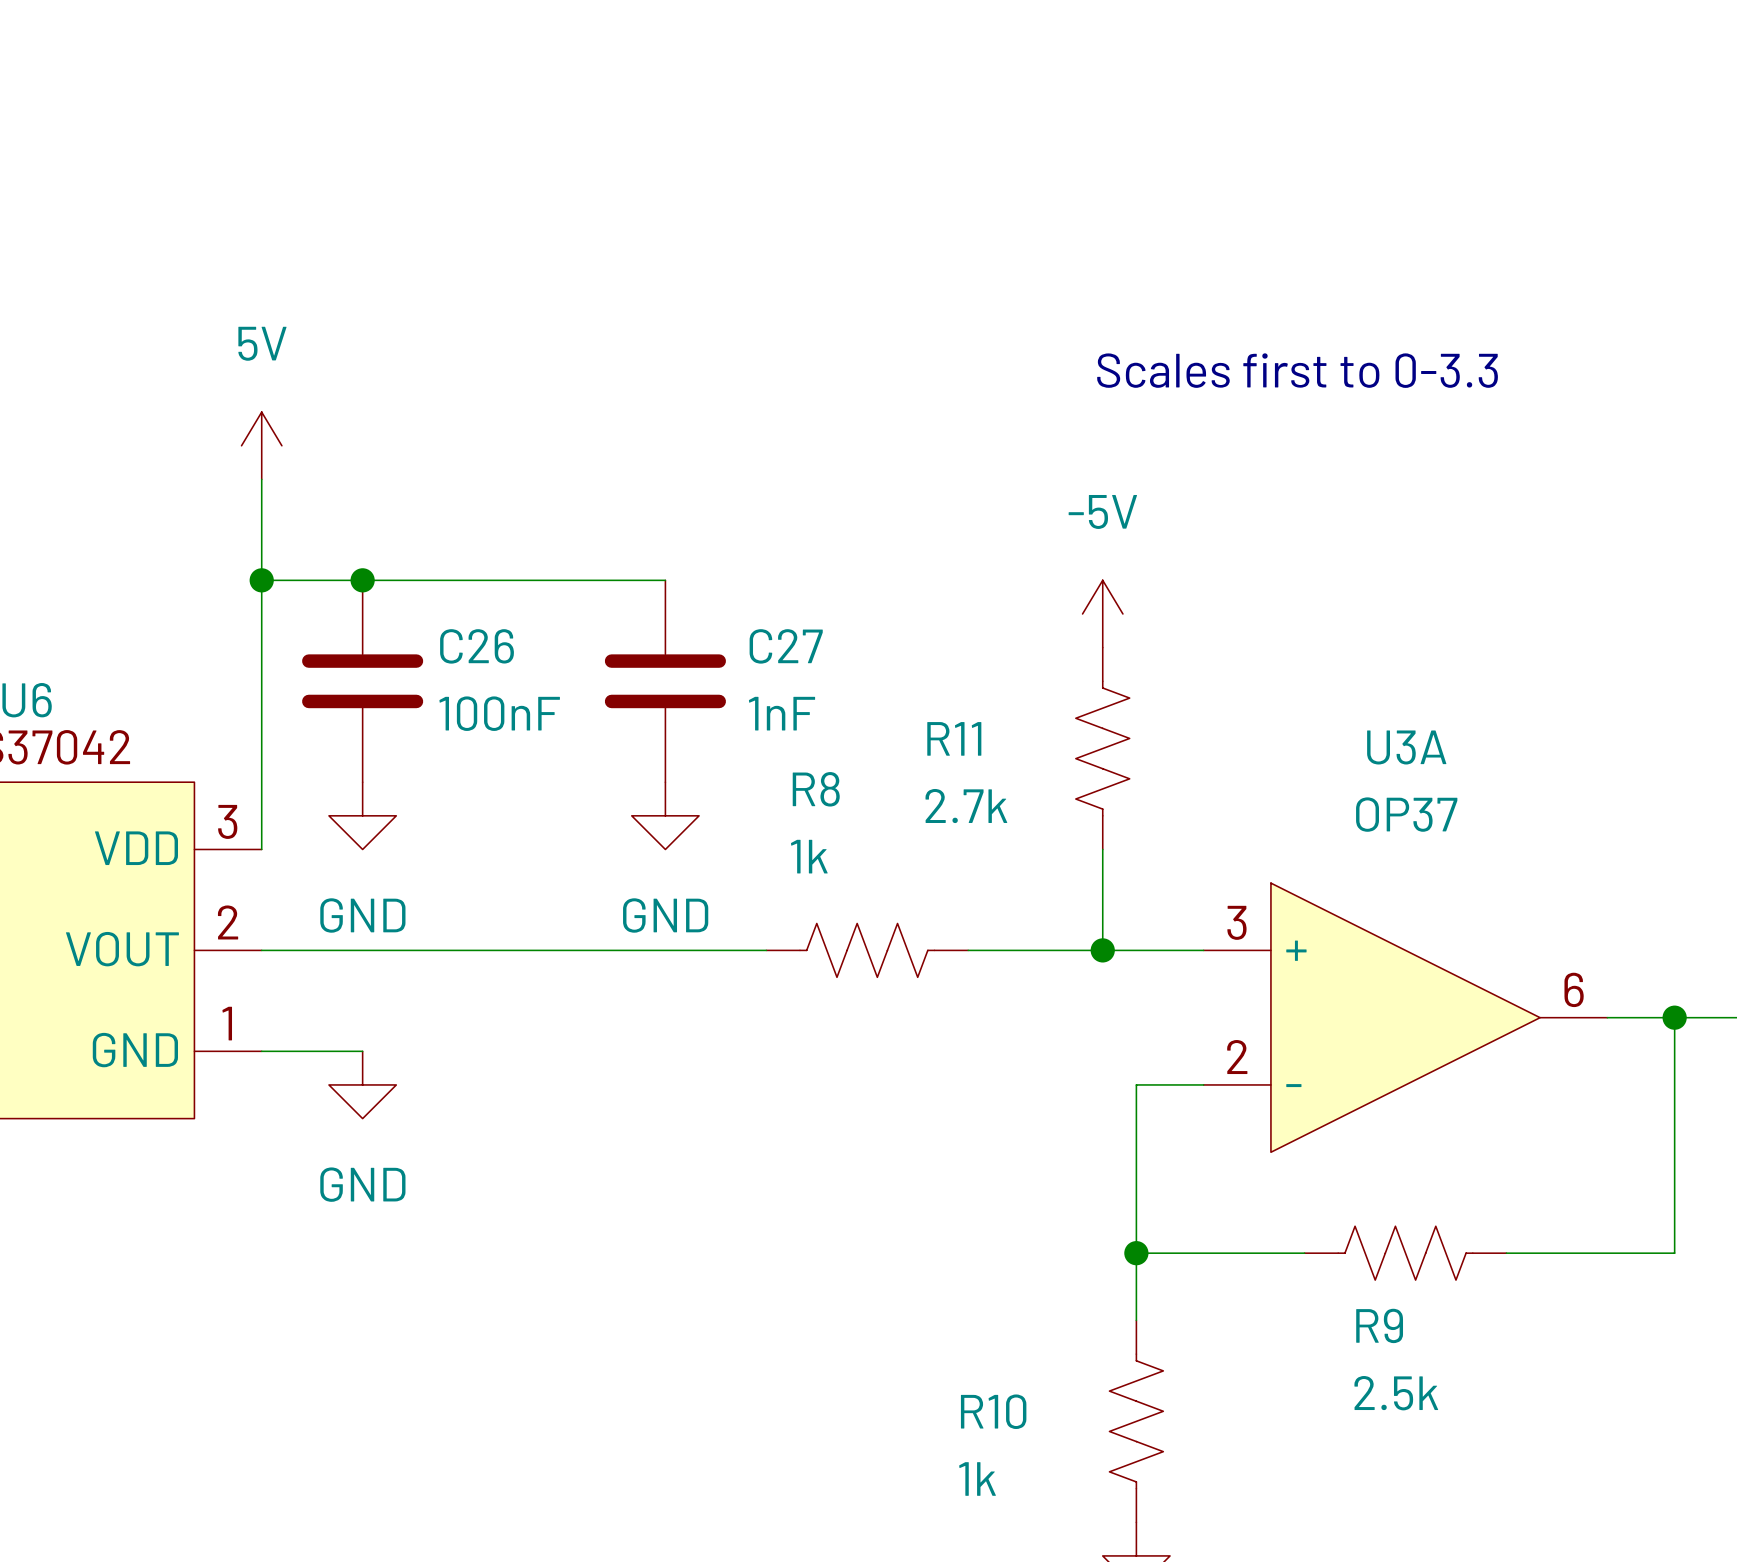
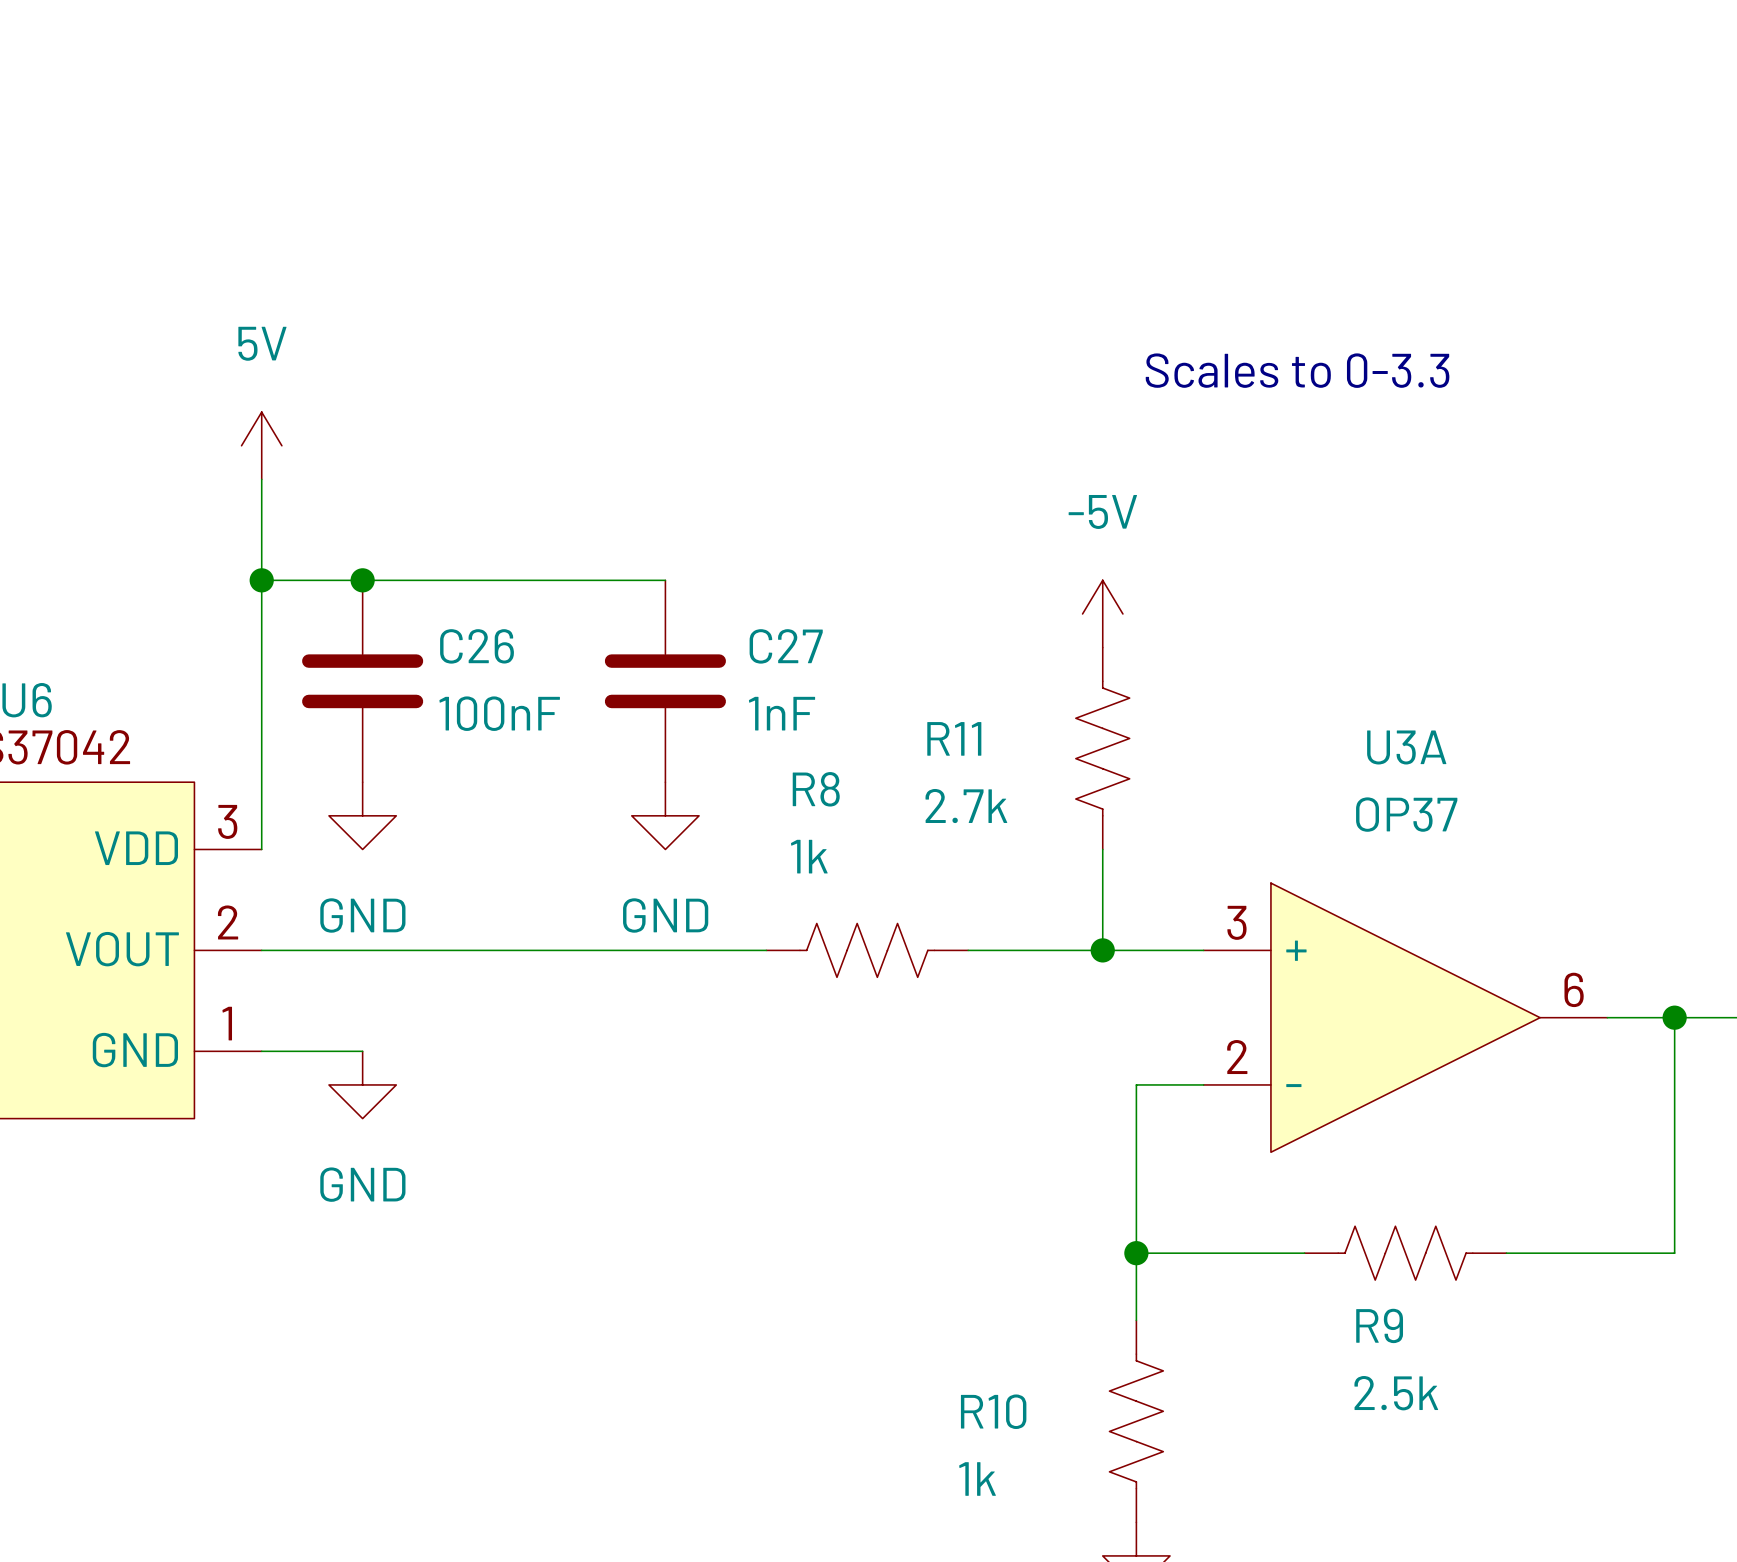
text: Scales first to 0-3.3 (1297, 370) -> Scales to 0-3.3 (1297, 370)

